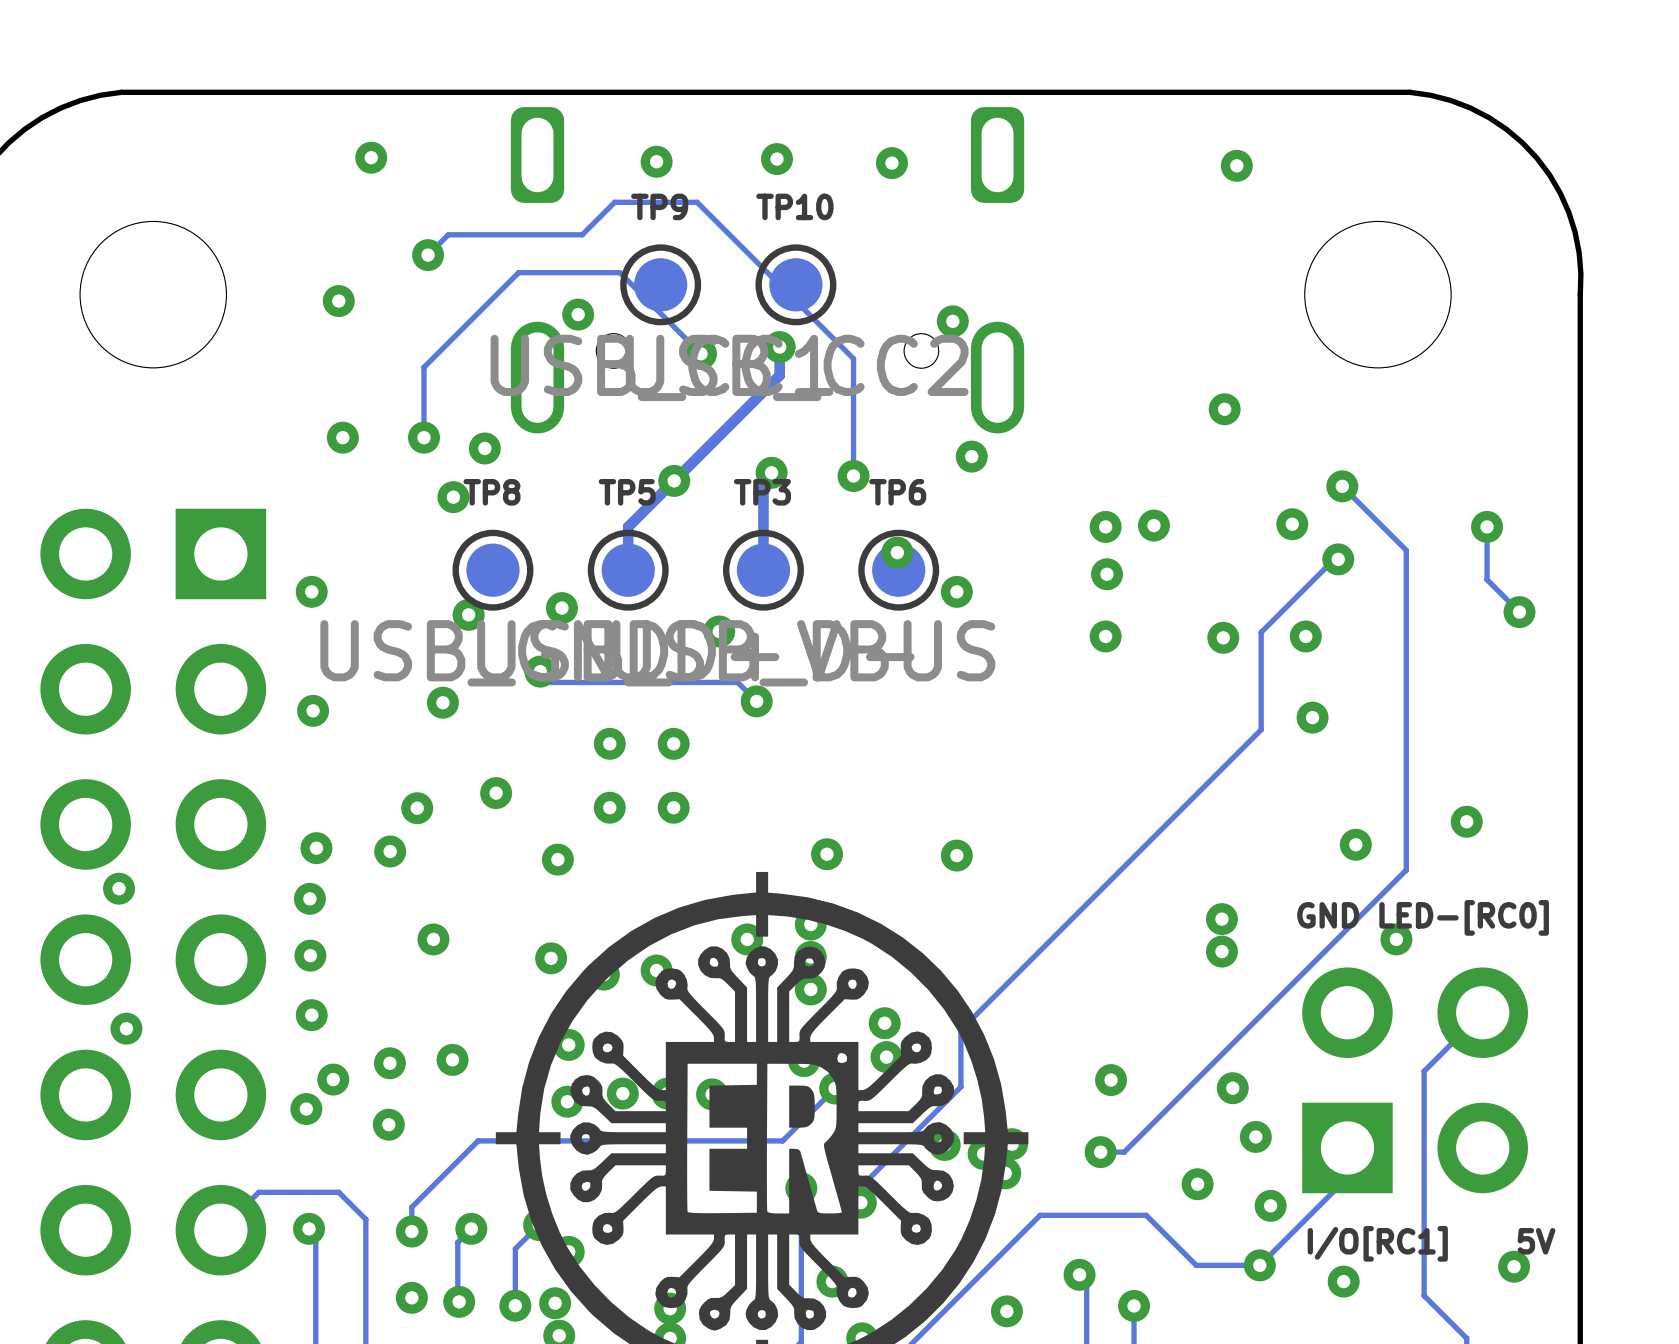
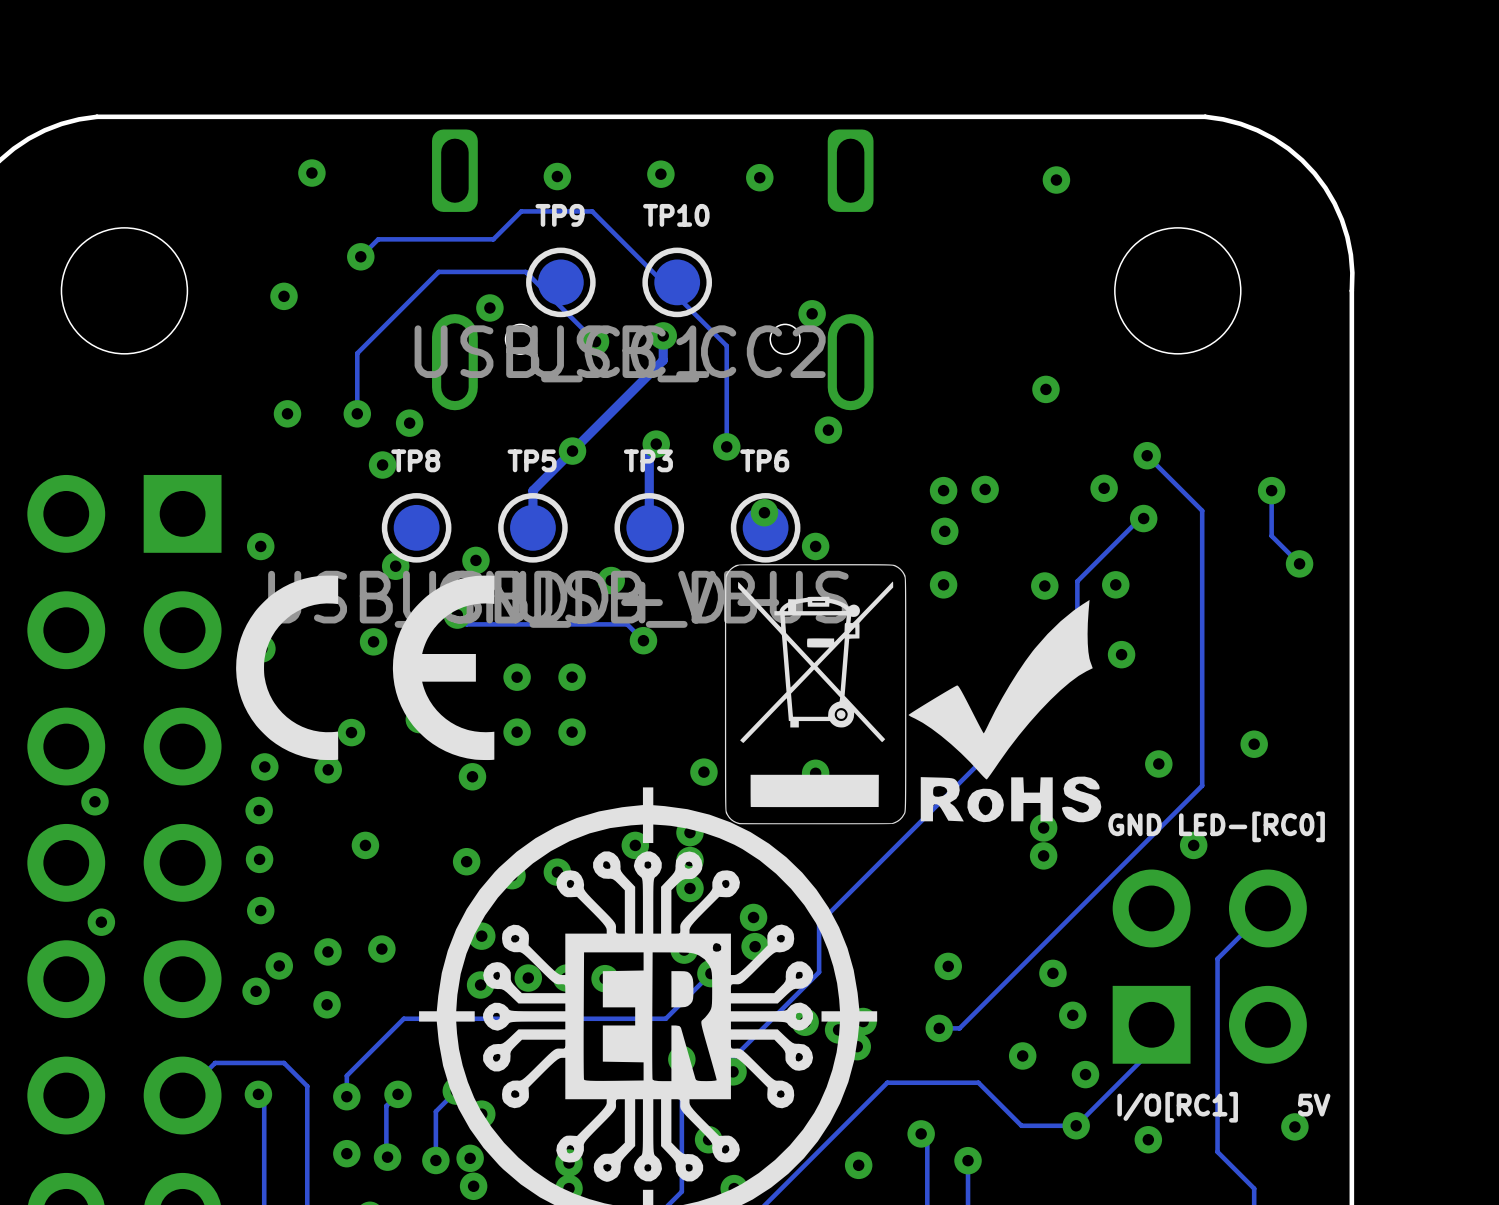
drawing: none -> [724, 564, 1102, 825]
drawing: none -> [236, 575, 495, 761]

